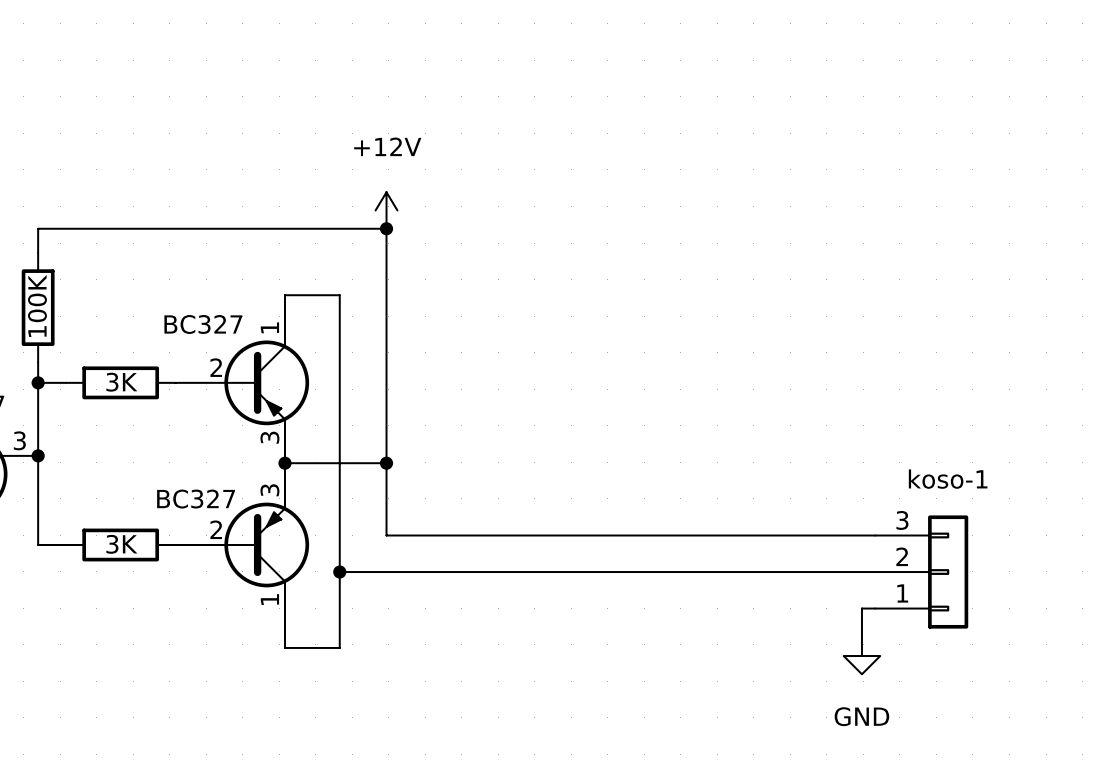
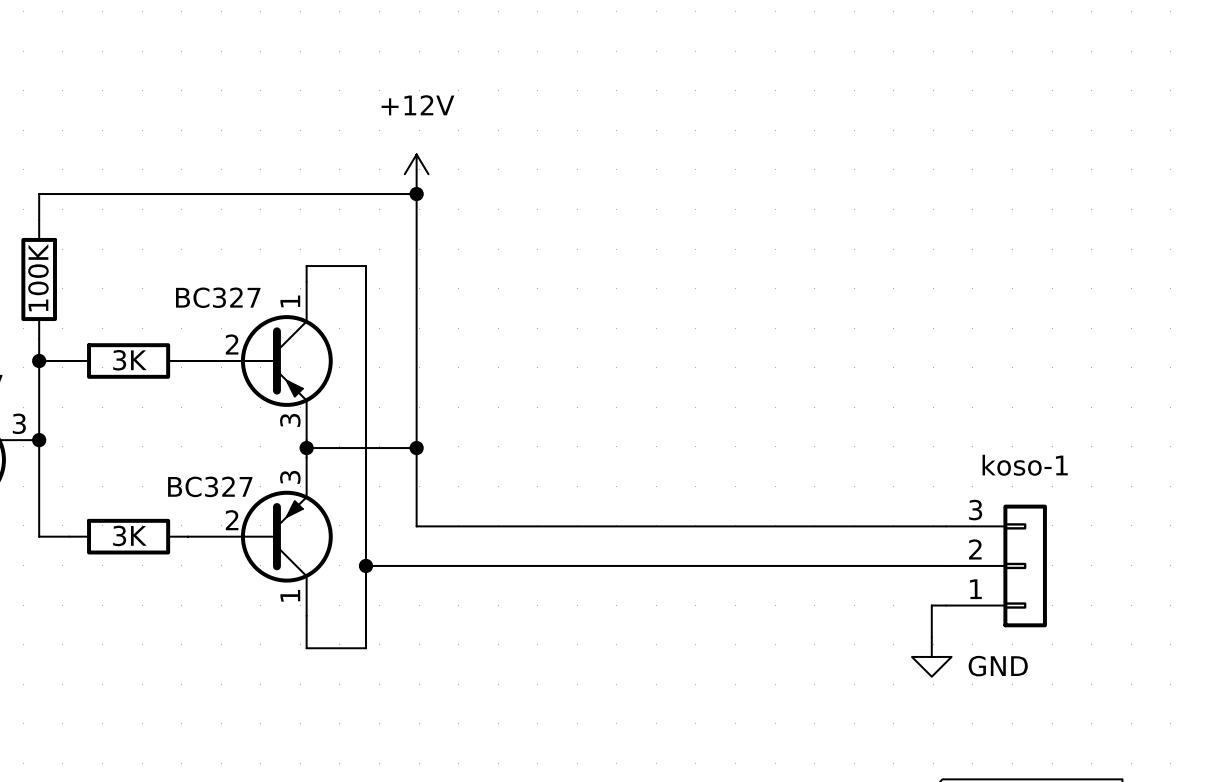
power symbol text position: GND (861, 716) -> GND (998, 666)

